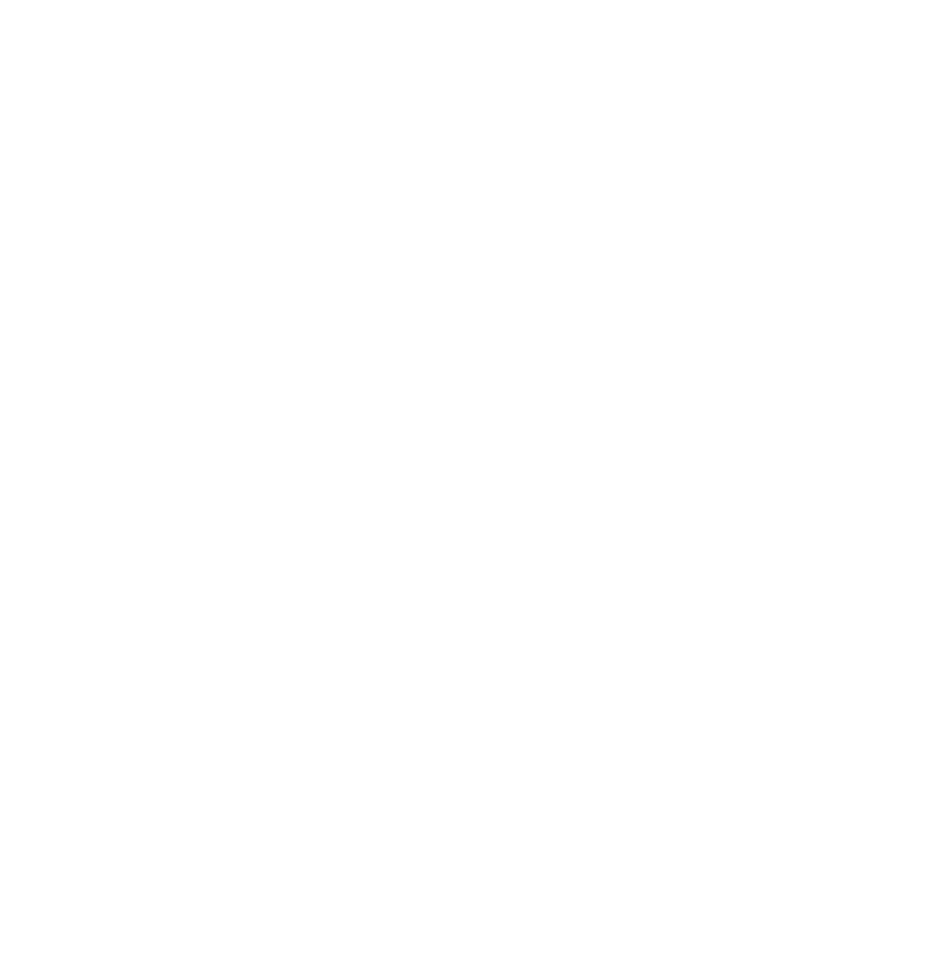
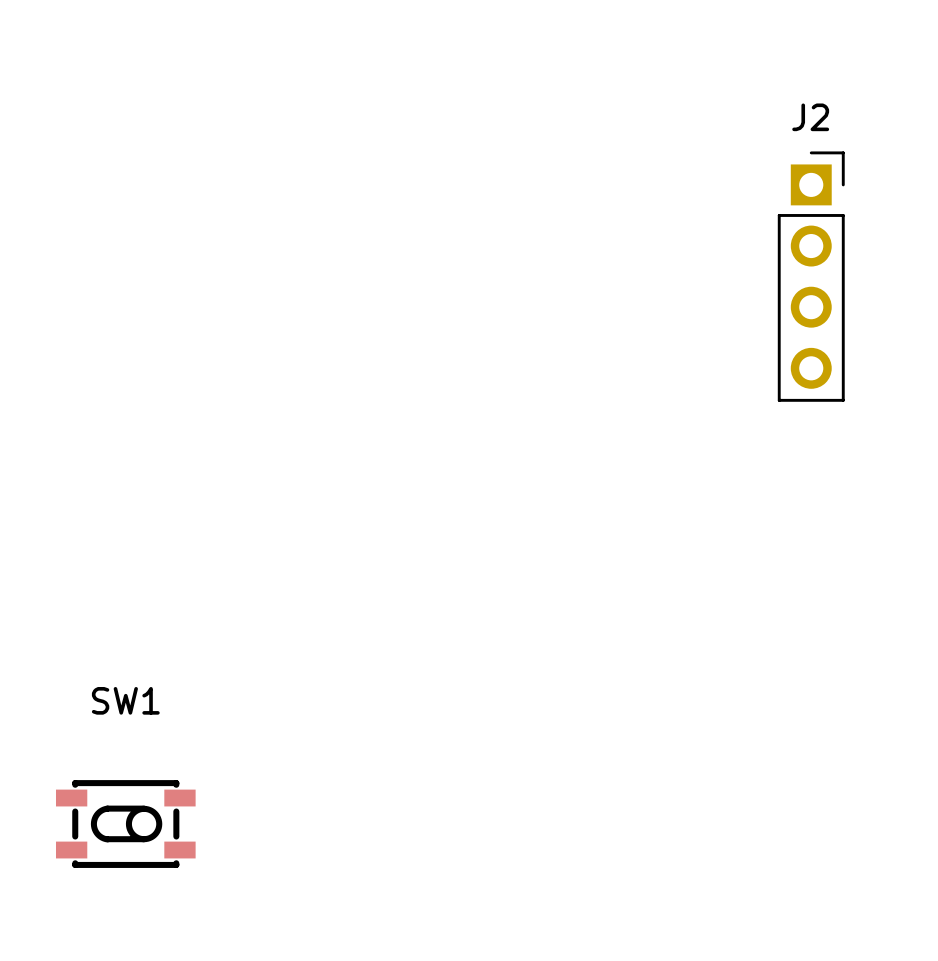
J2: none -> (811, 276)
SW1: none -> (125, 824)

